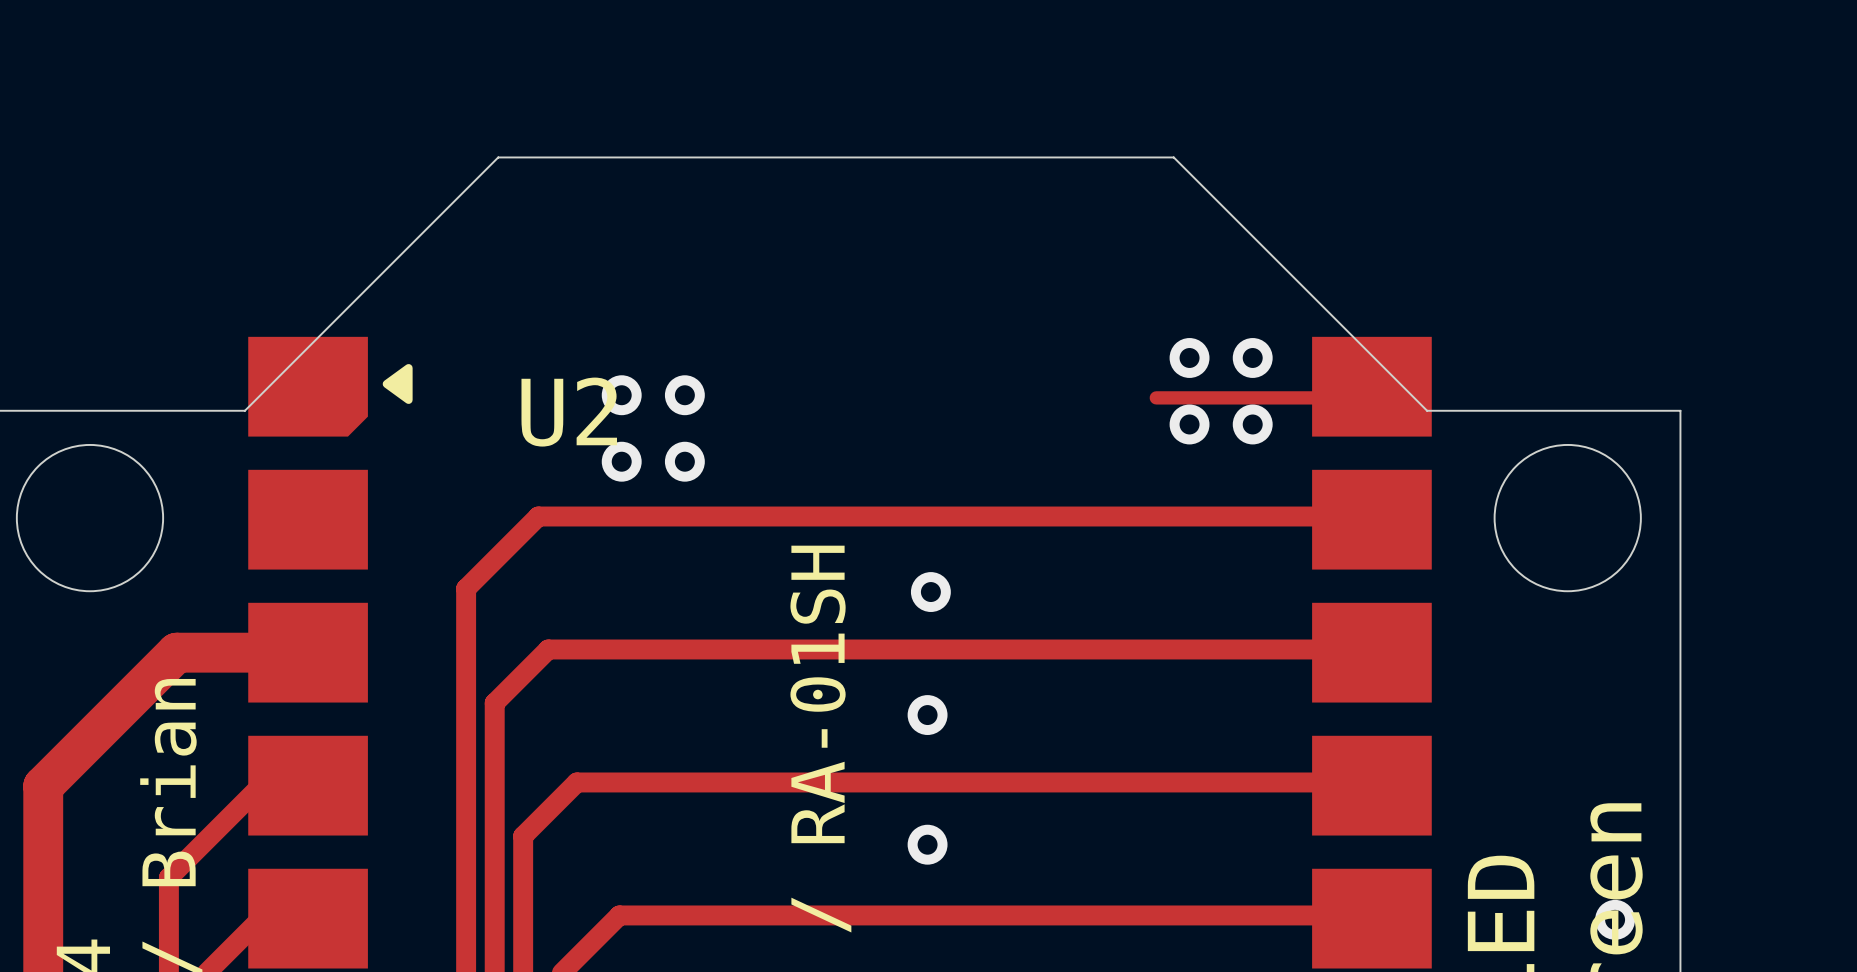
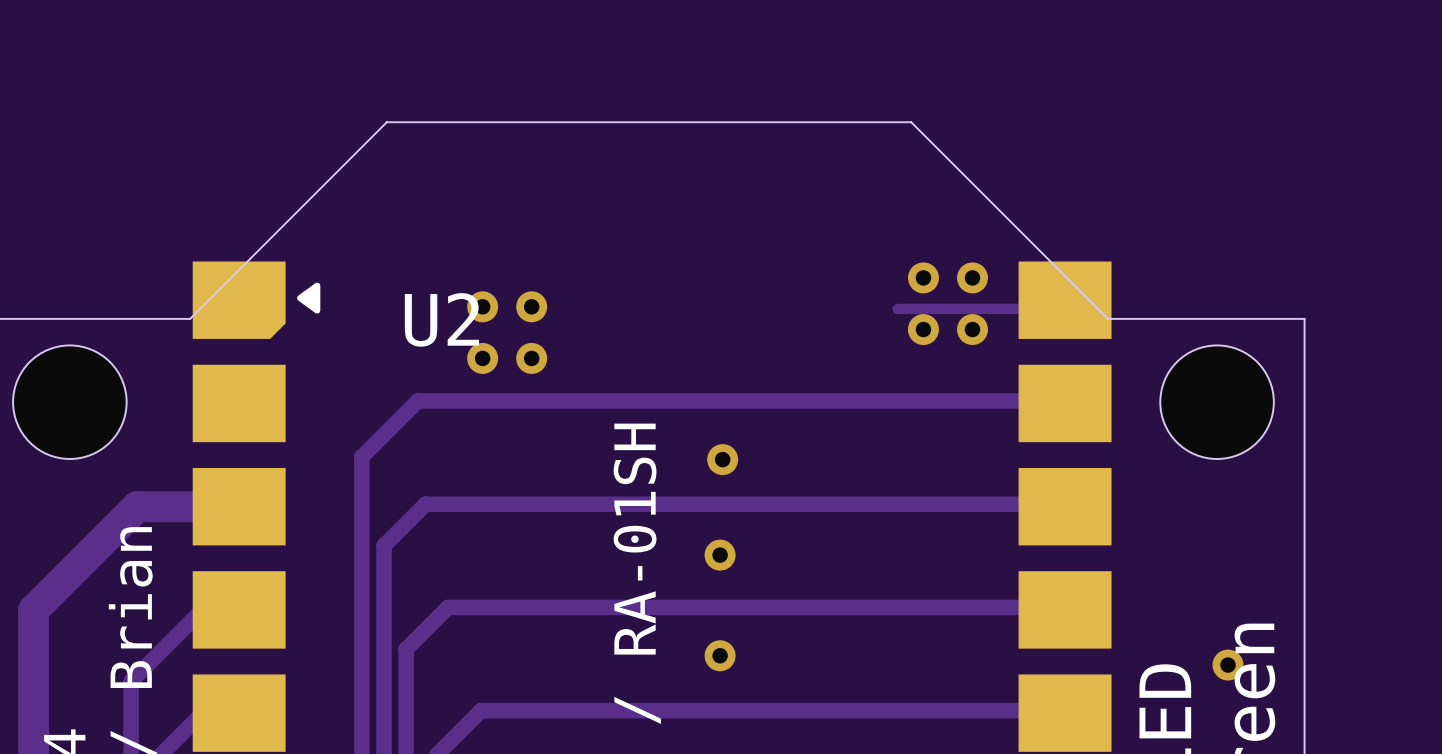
via: none -> (1228, 665)
via: (1615, 919) -> none

